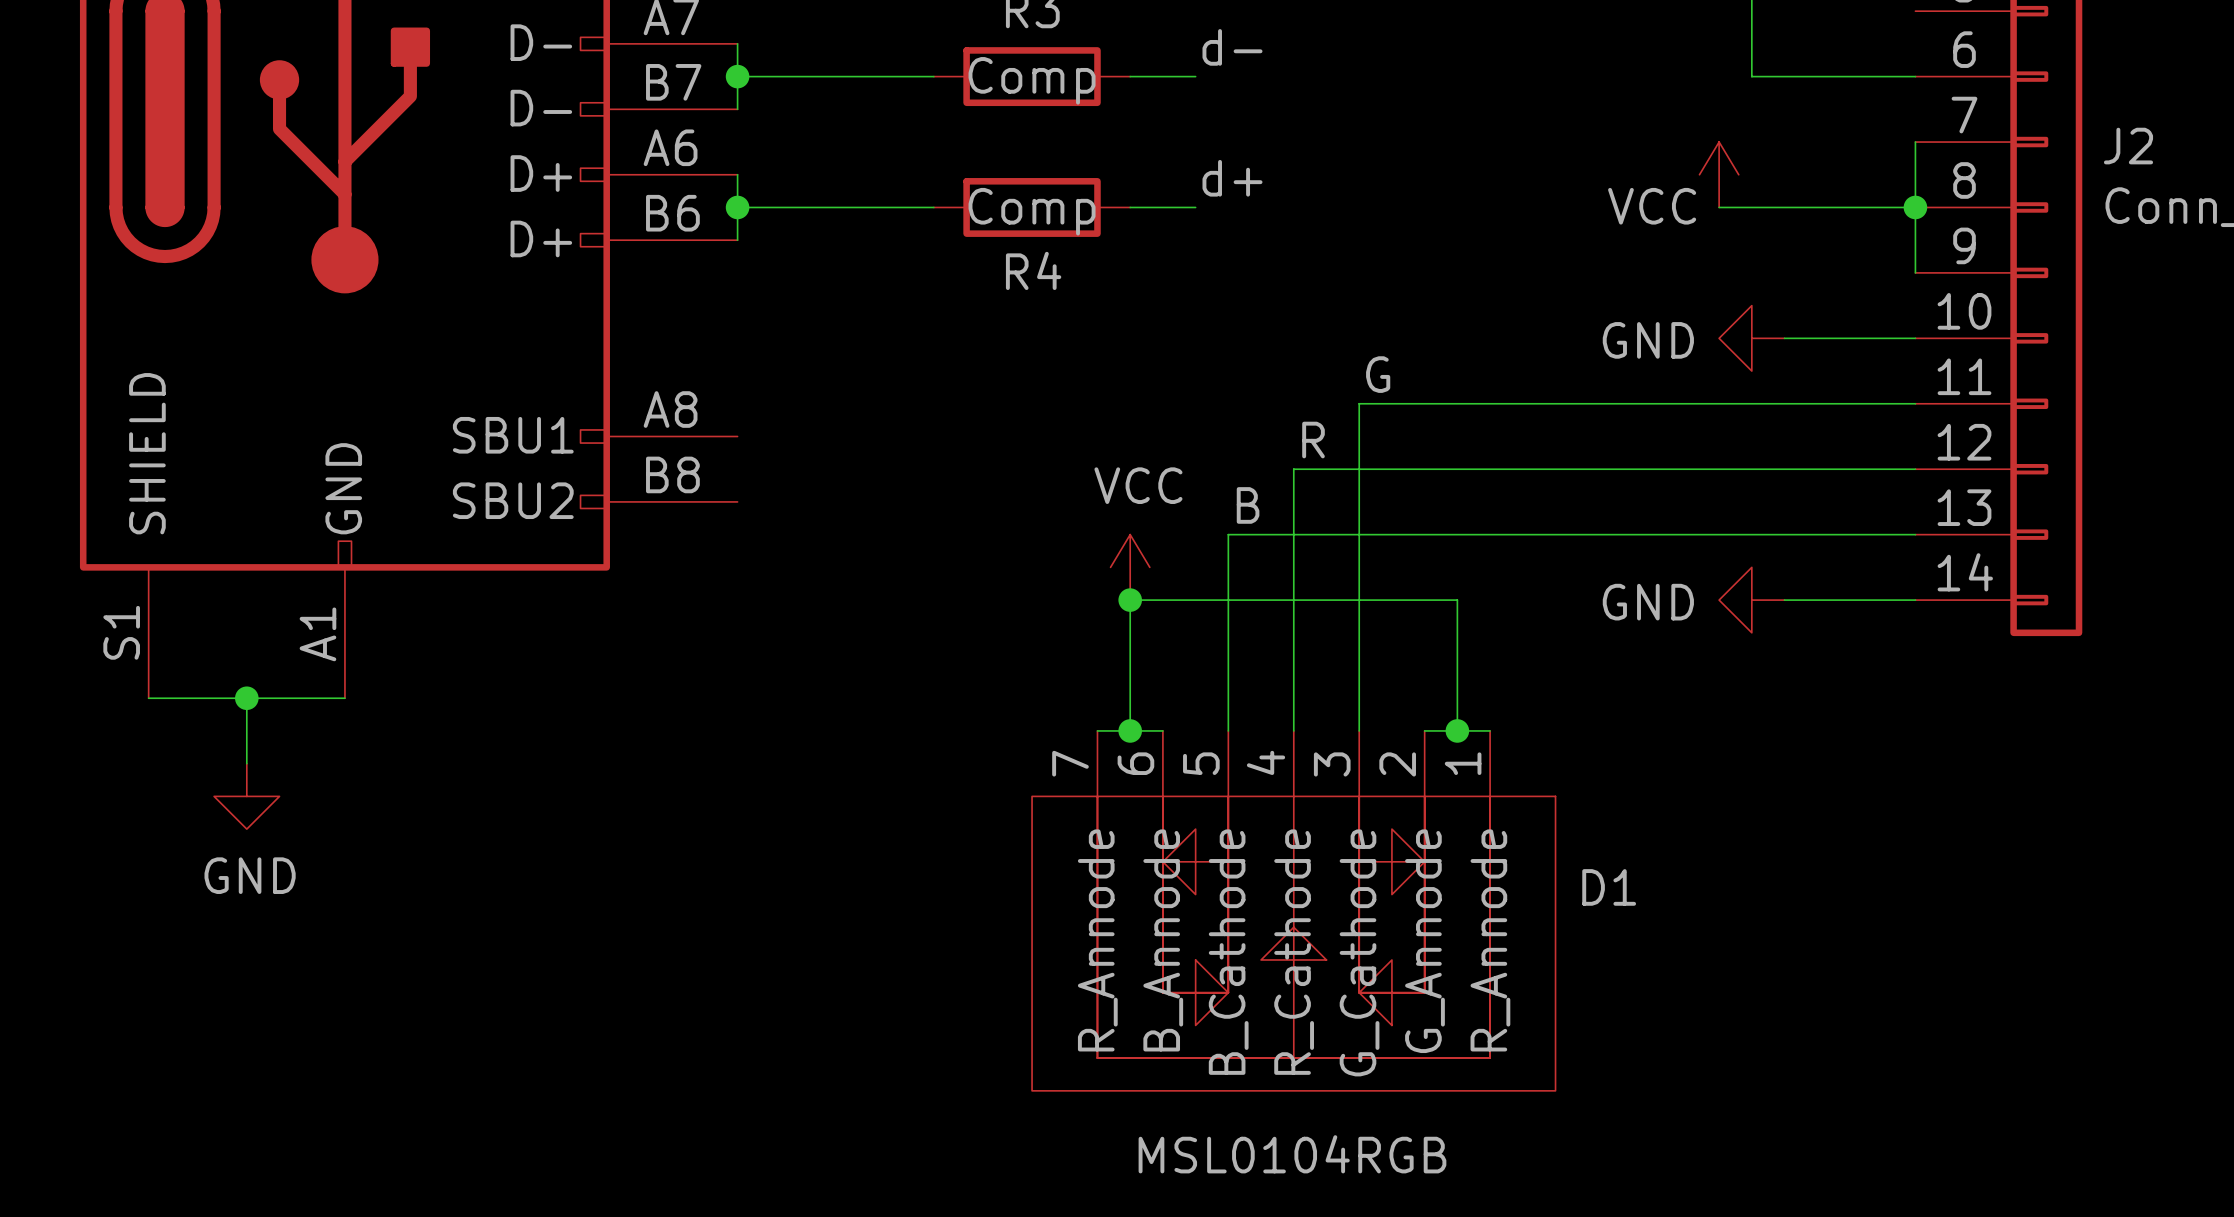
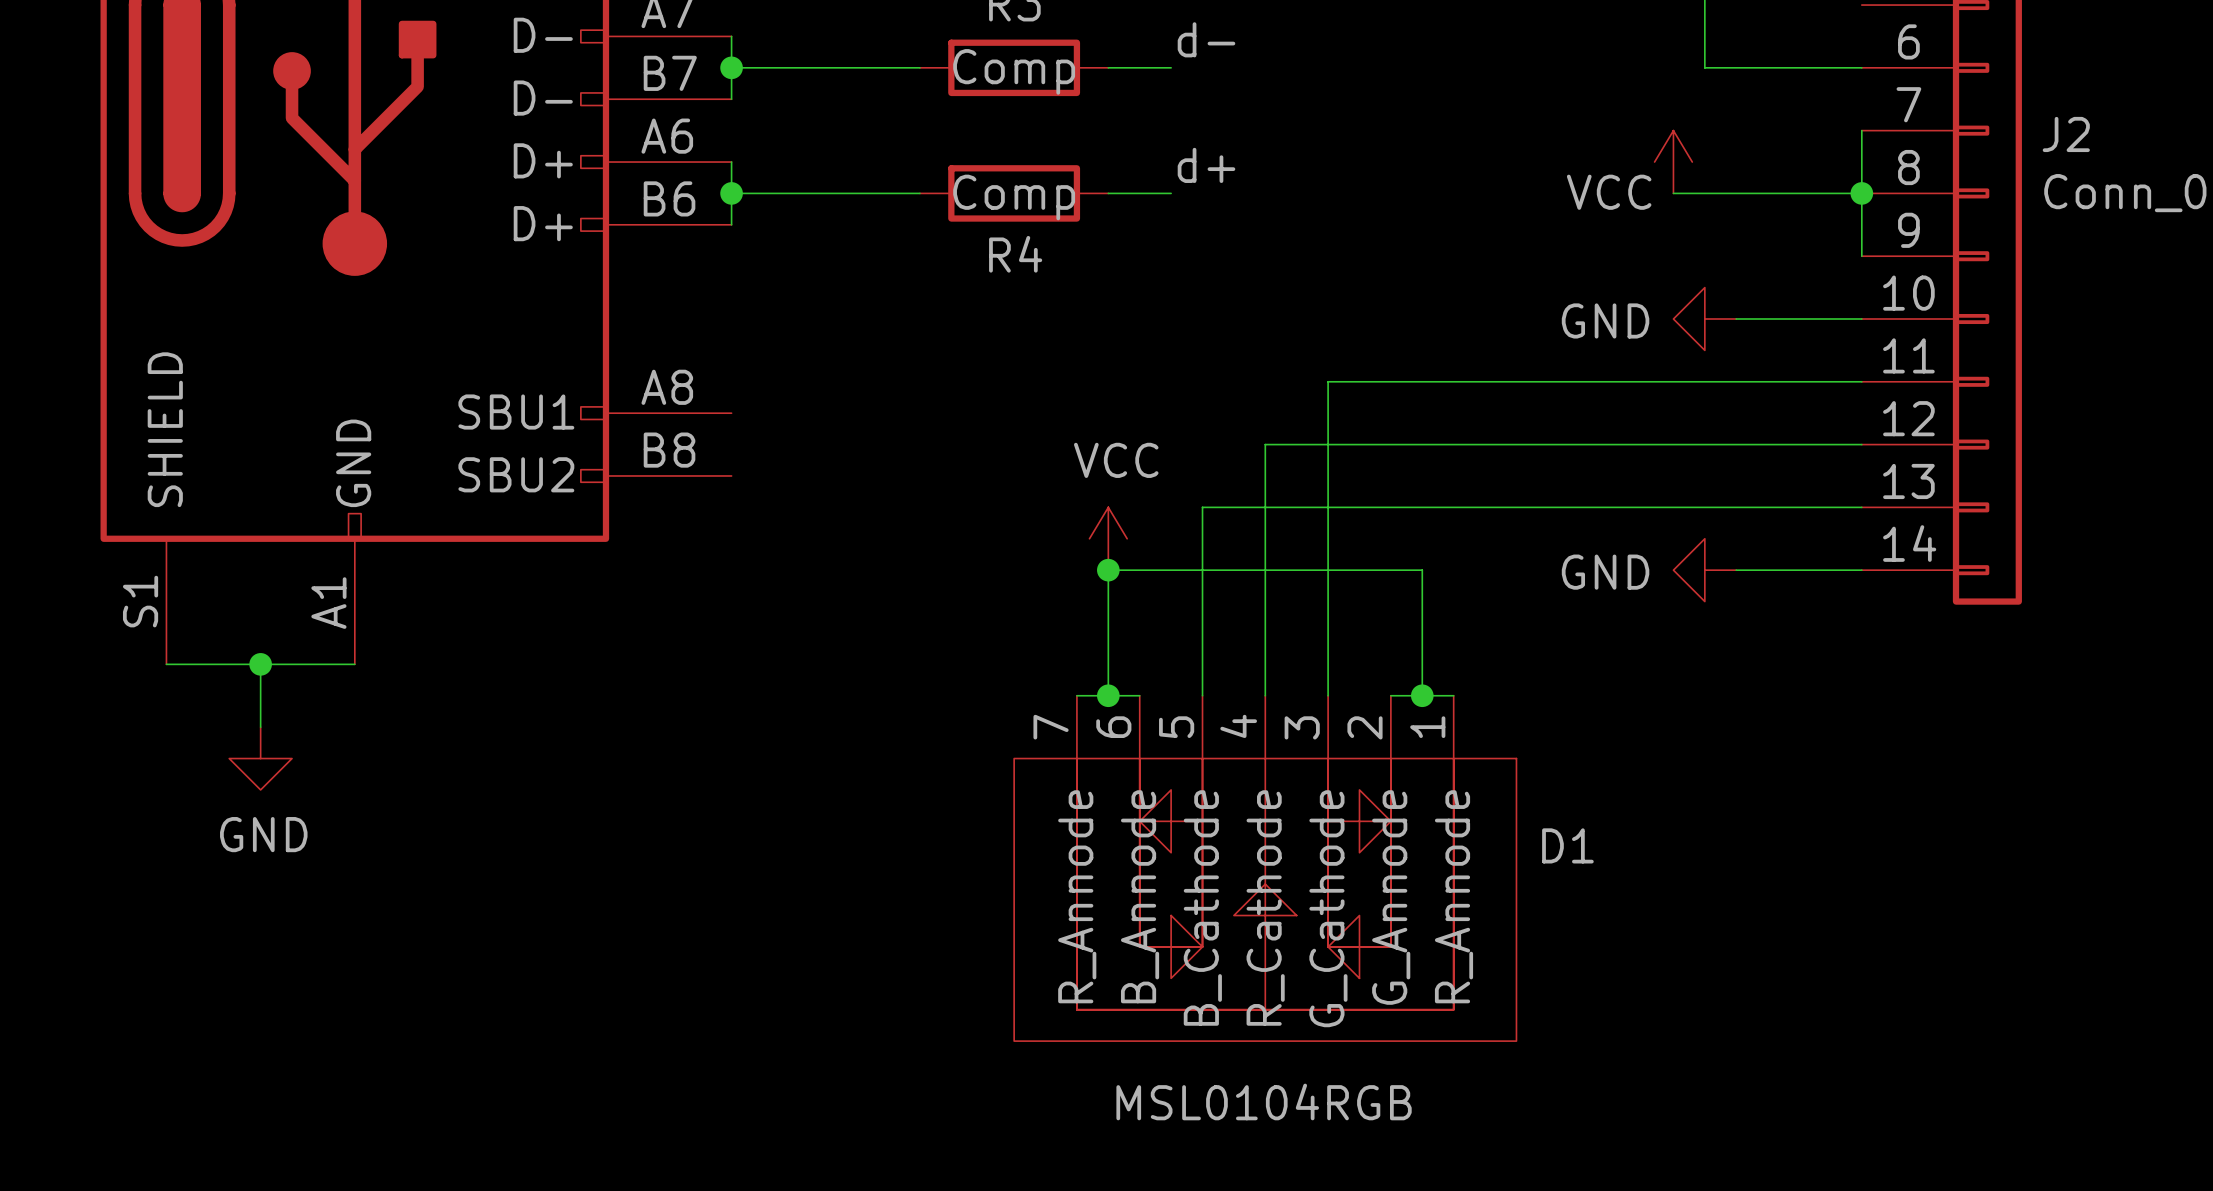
label: G (1378, 374) -> none
label: R (1313, 440) -> none
label: B (1248, 505) -> none

